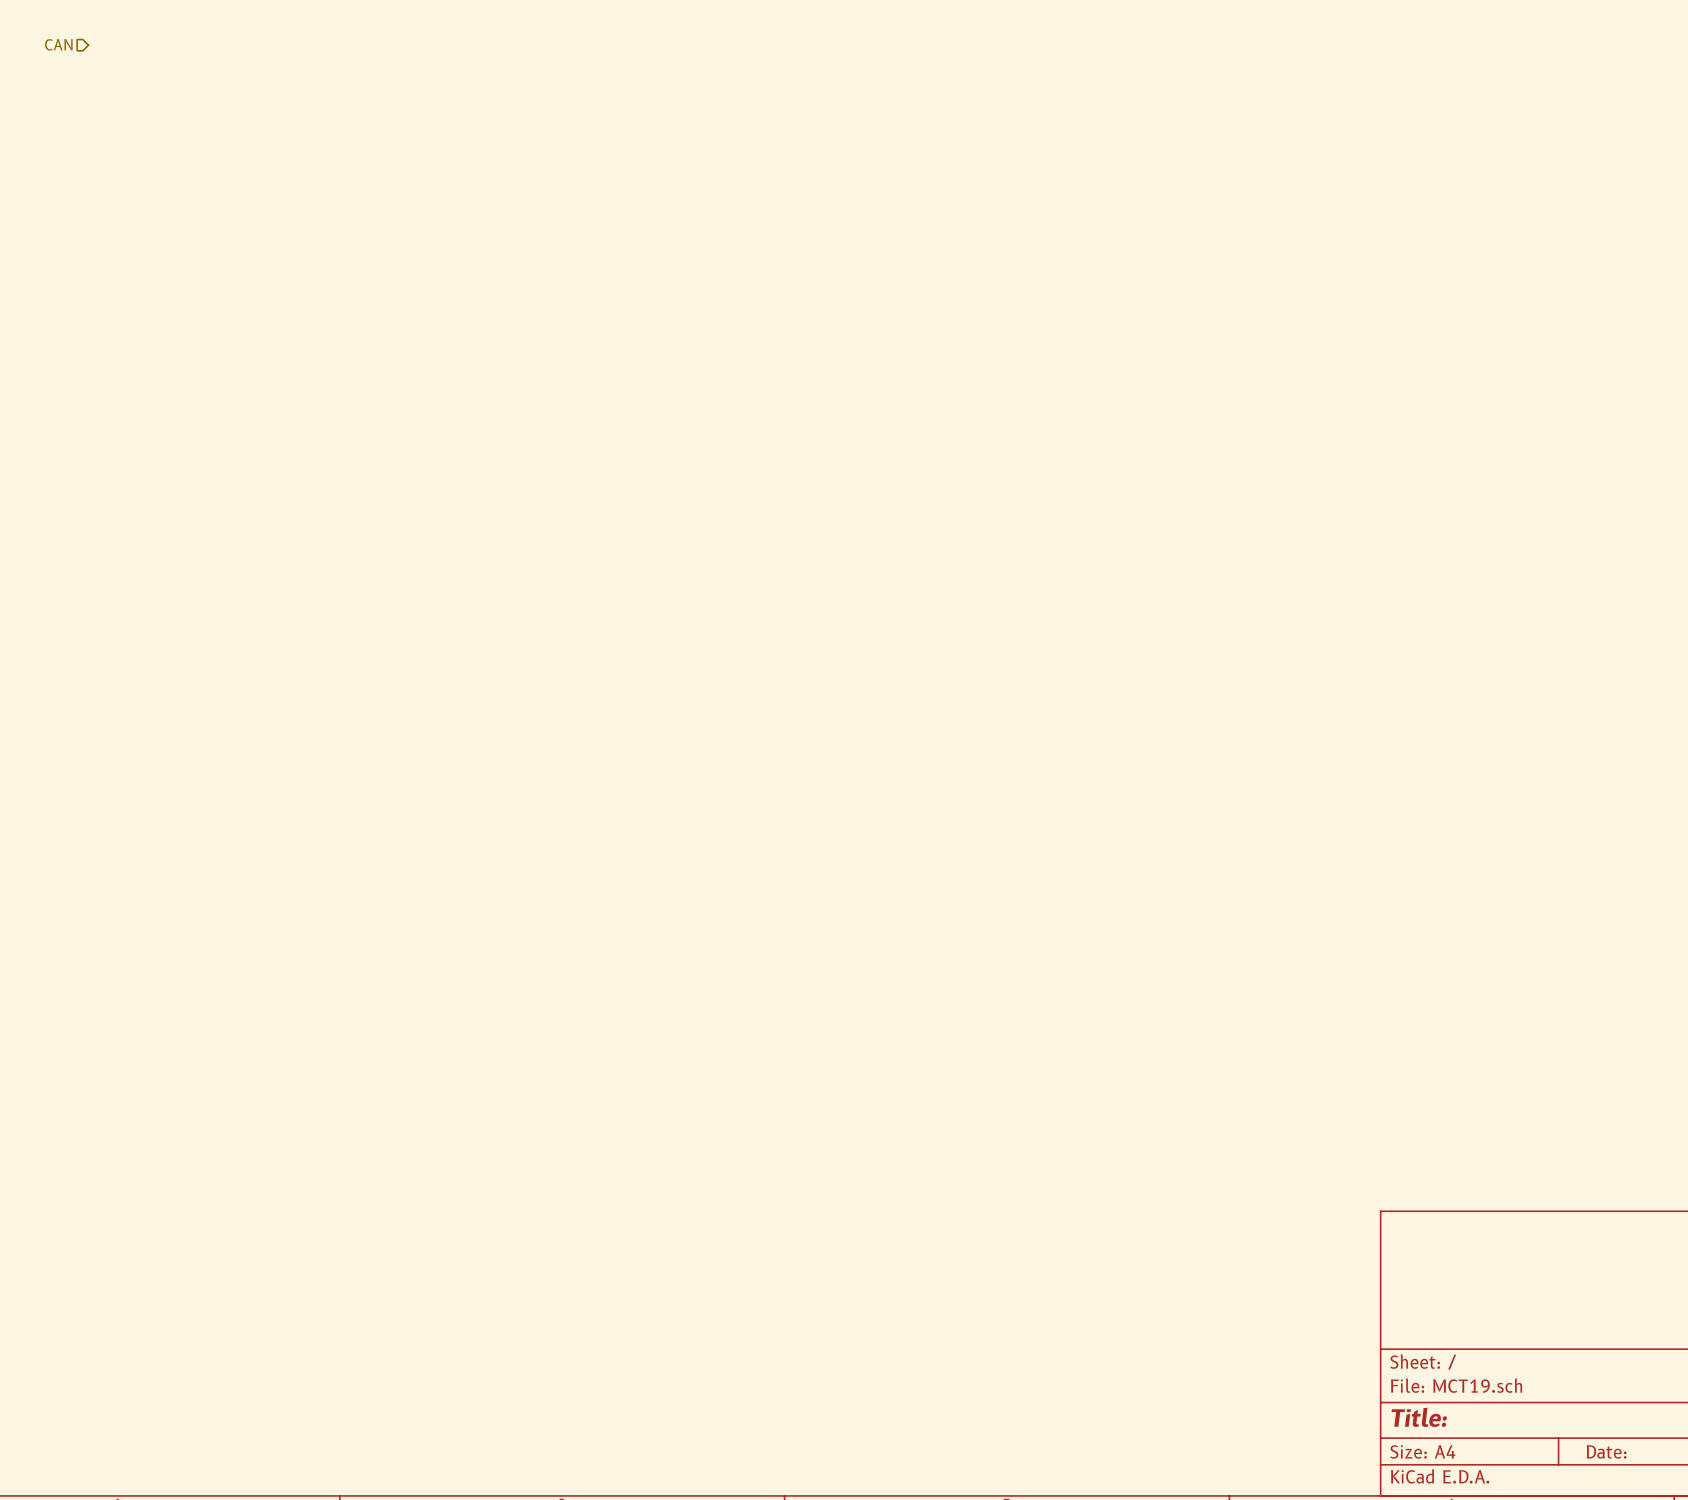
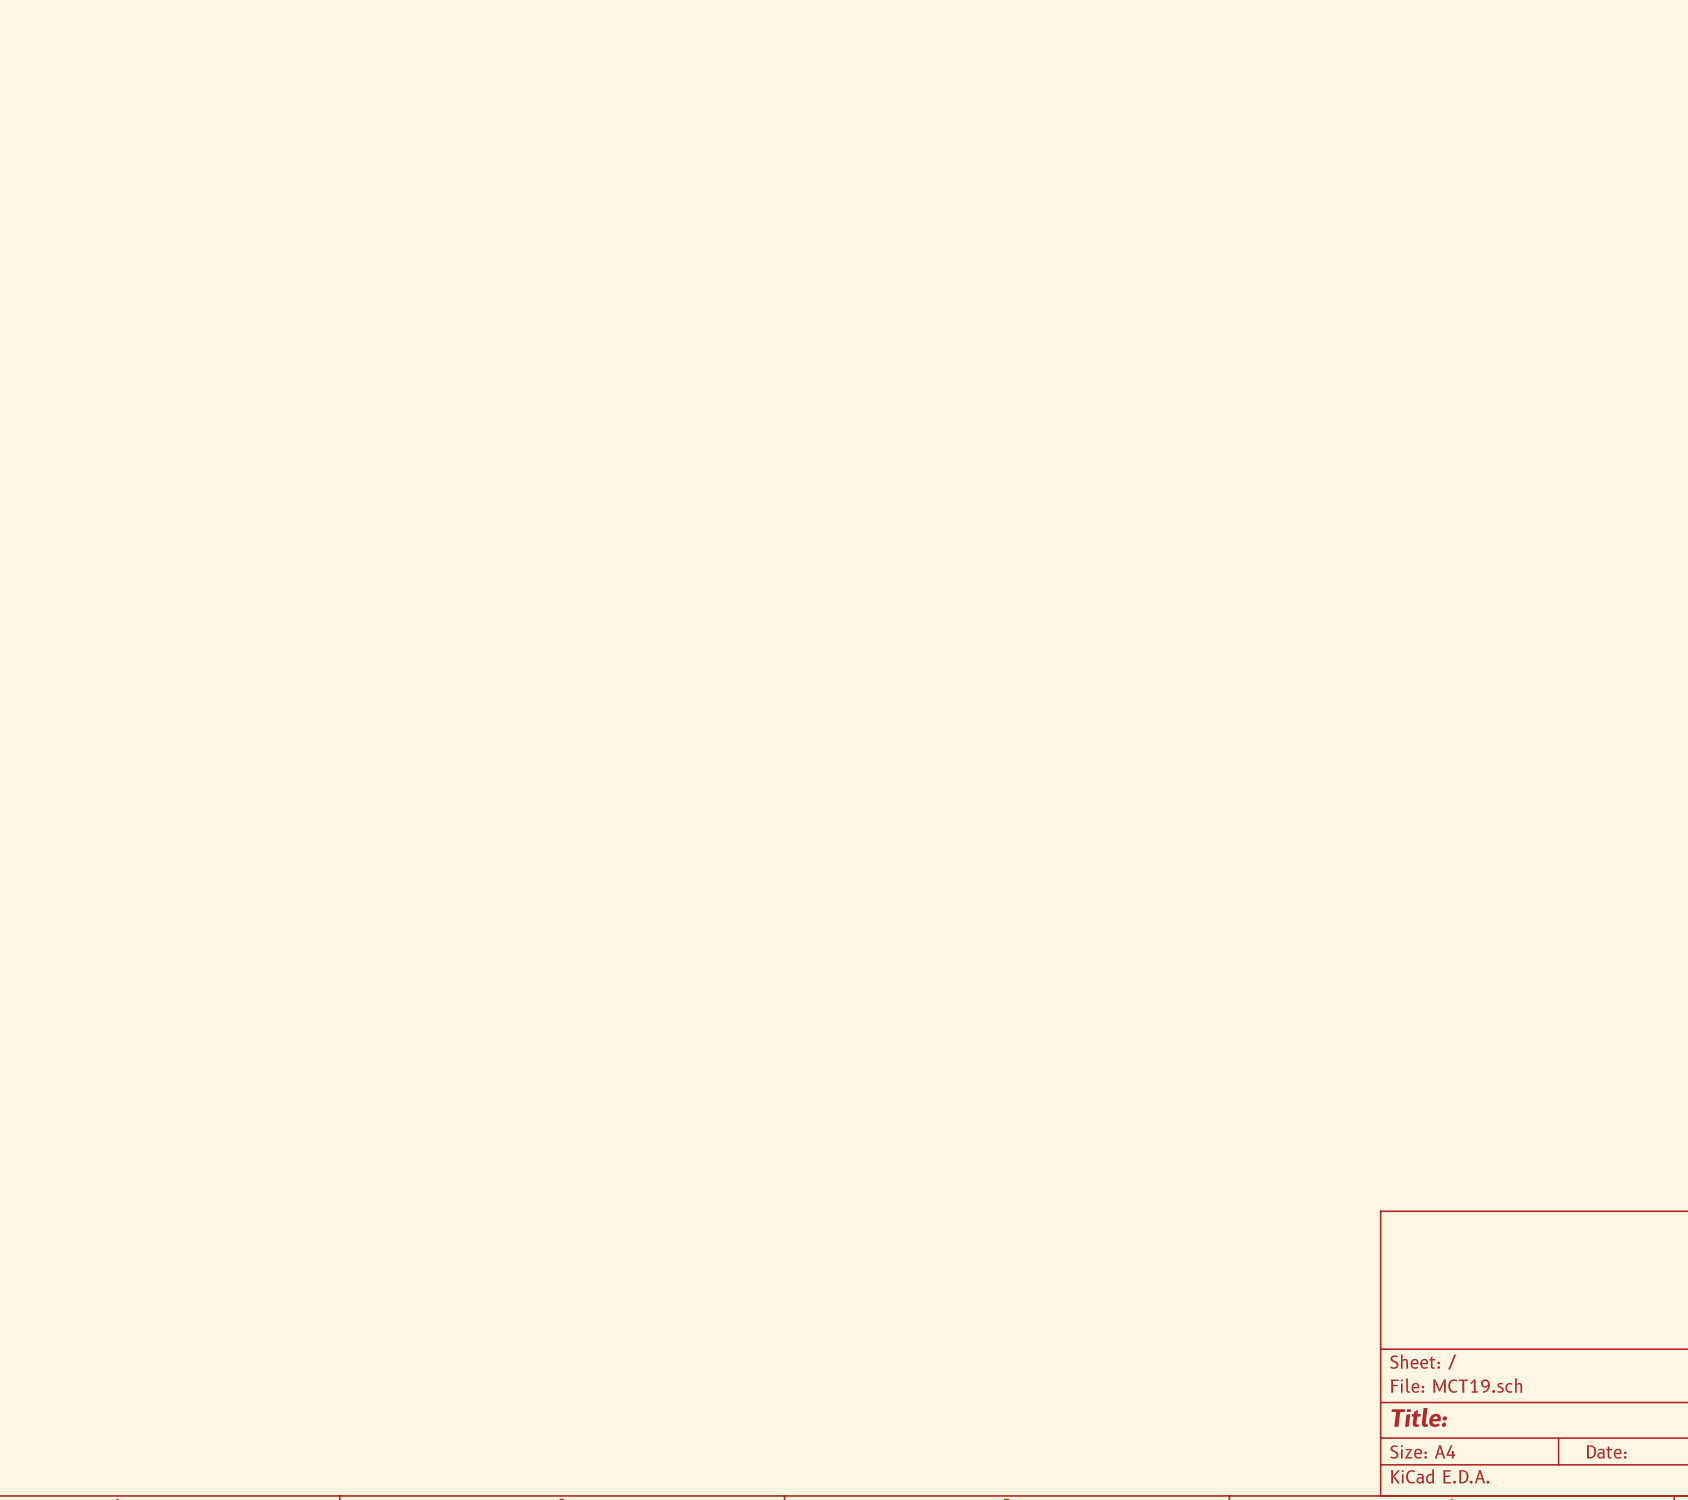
hierarchical label: CAN (58, 44) -> none

